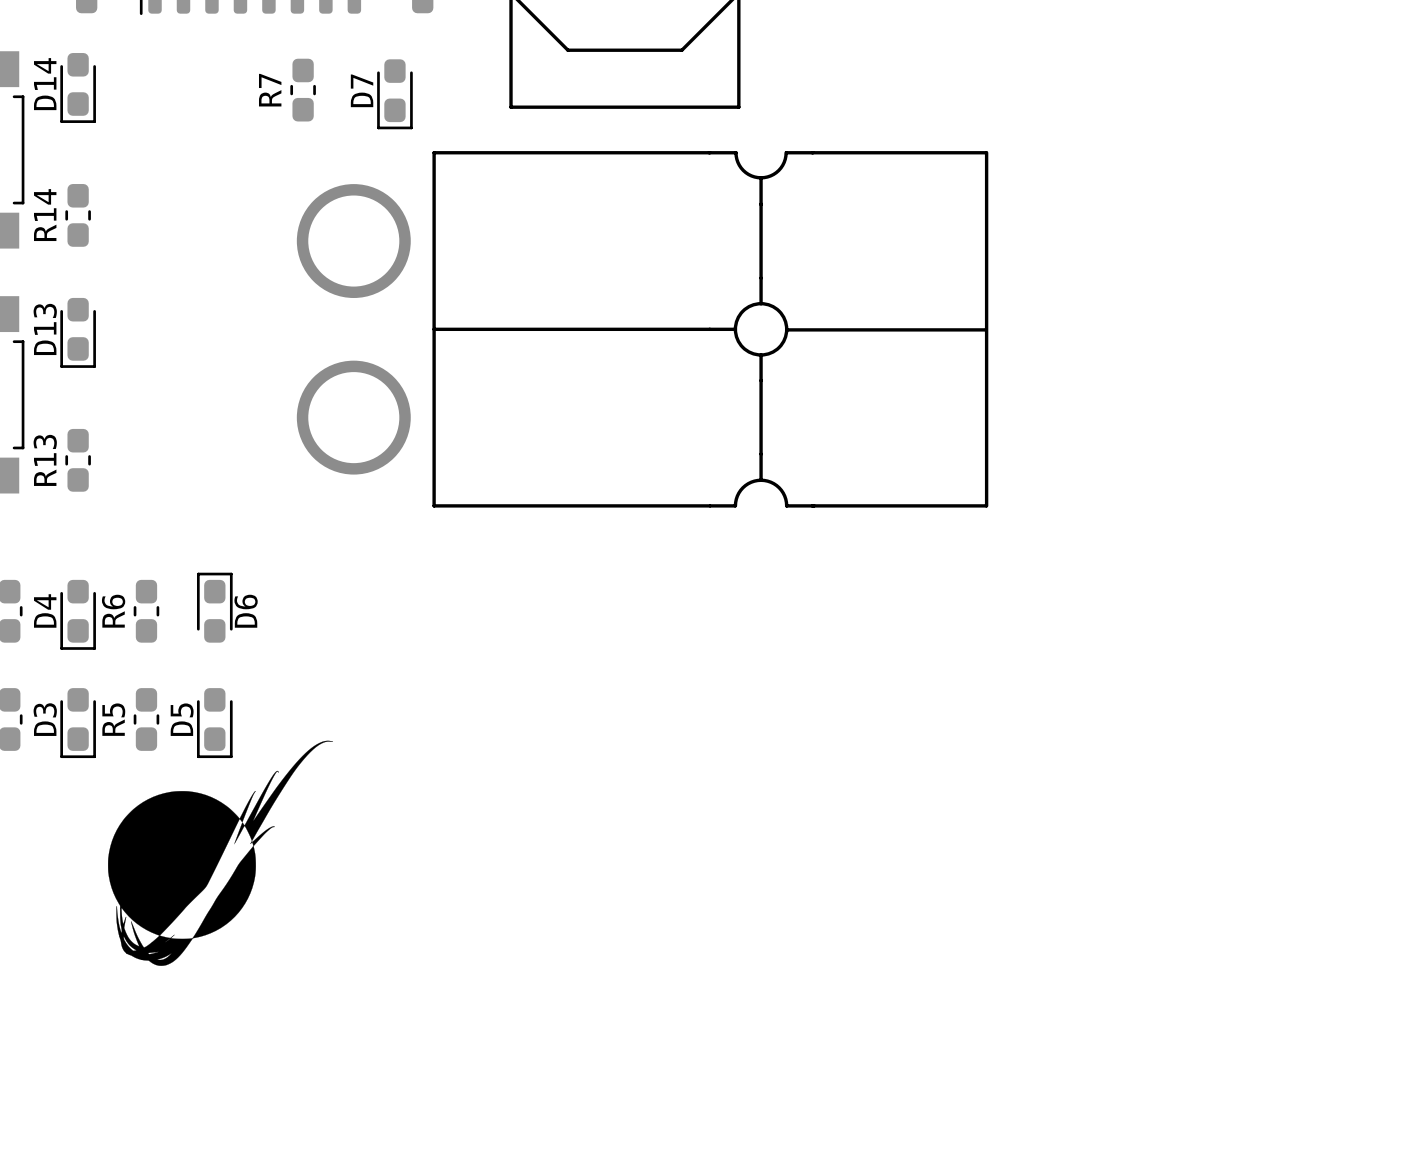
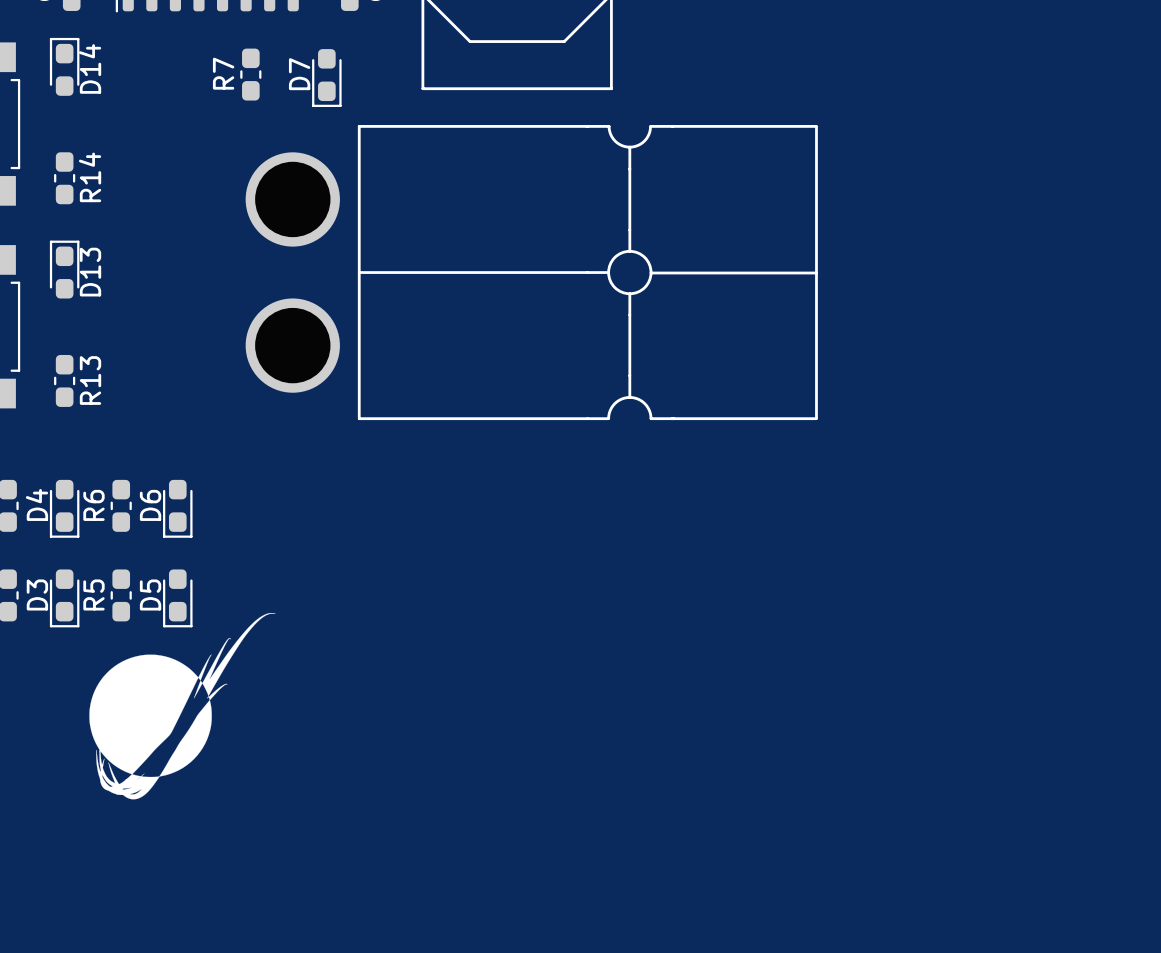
D14 rotation: 0° (78, 87) -> 180° (64, 66)
R14 name position: R14 (45, 215) -> R14 (90, 177)
D13 rotation: 0° (78, 332) -> 180° (64, 269)
R13 name position: R13 (45, 460) -> R13 (90, 380)
D6 rotation: 0° (214, 607) -> 180° (177, 508)

